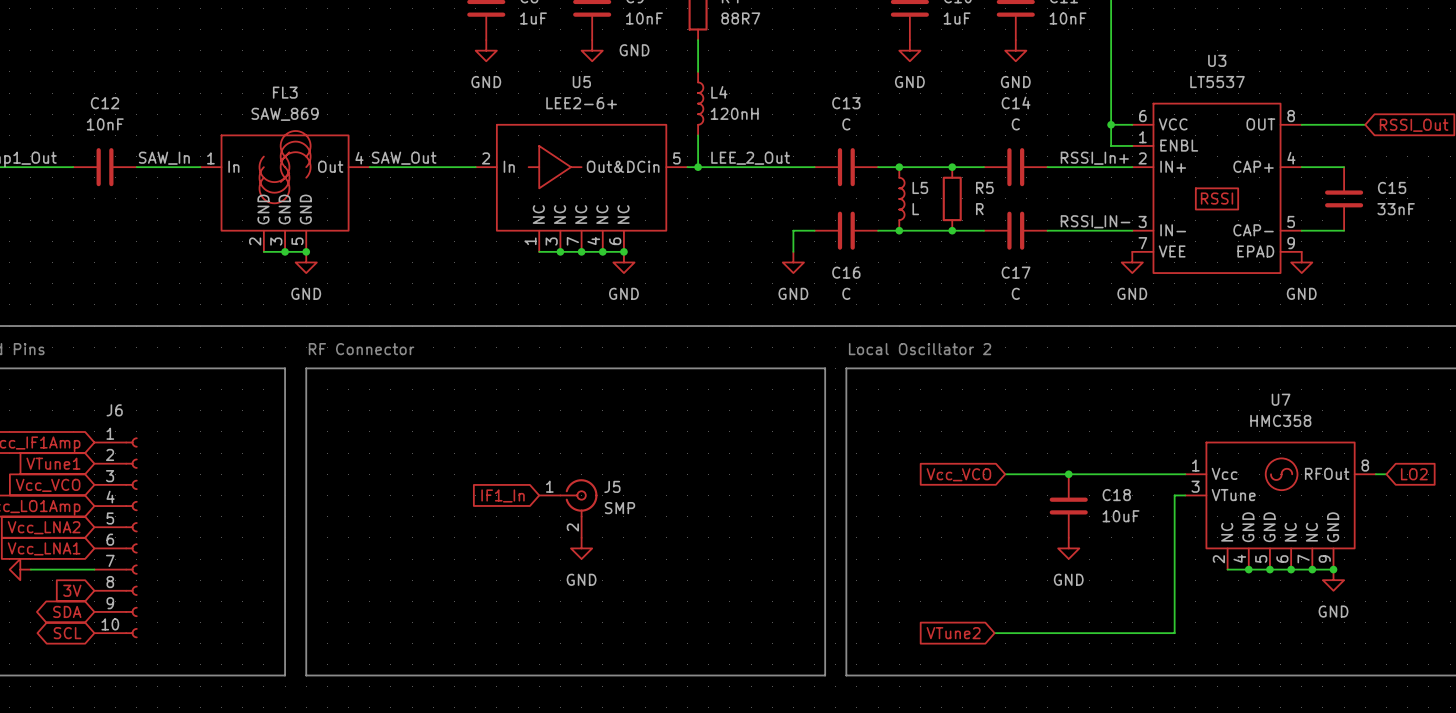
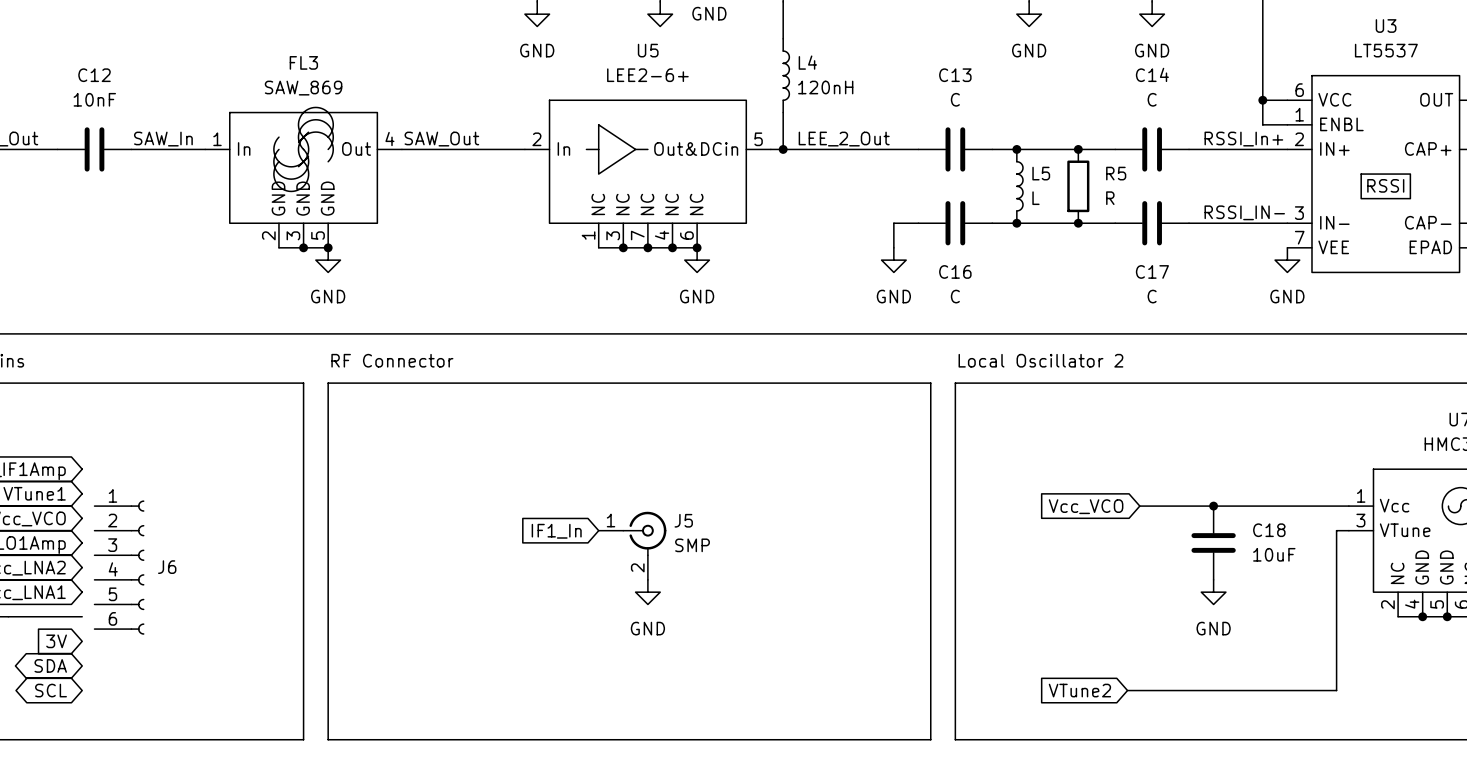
J6 name position: J6 (114, 410) -> J6 (167, 567)
J6 symbol: [94, 437, 138, 639] -> [94, 500, 145, 635]

